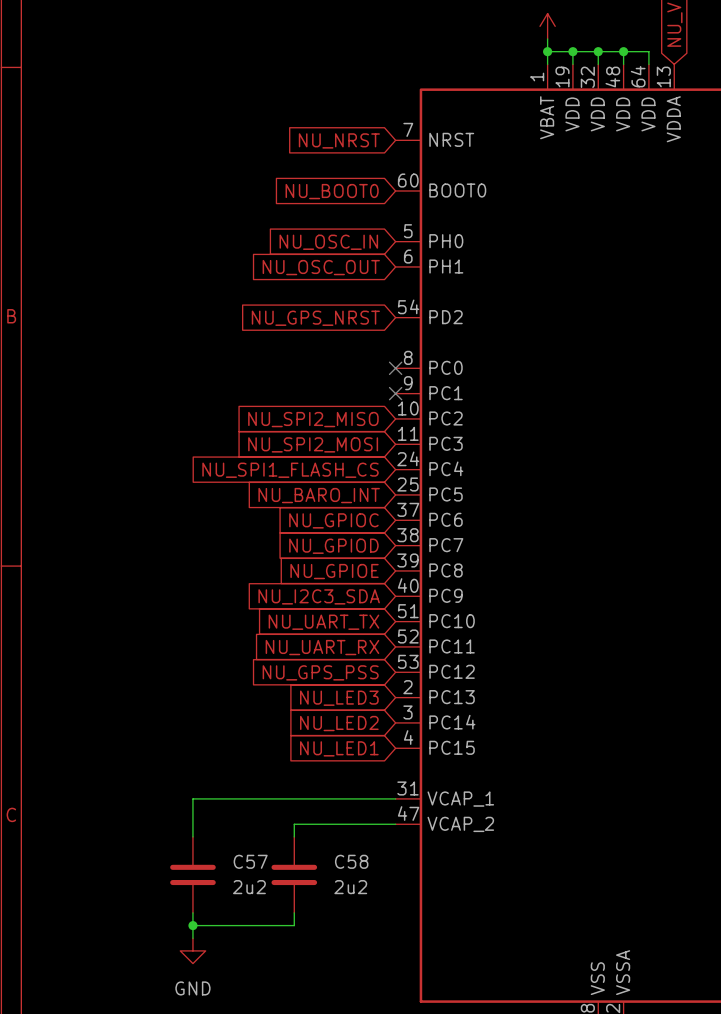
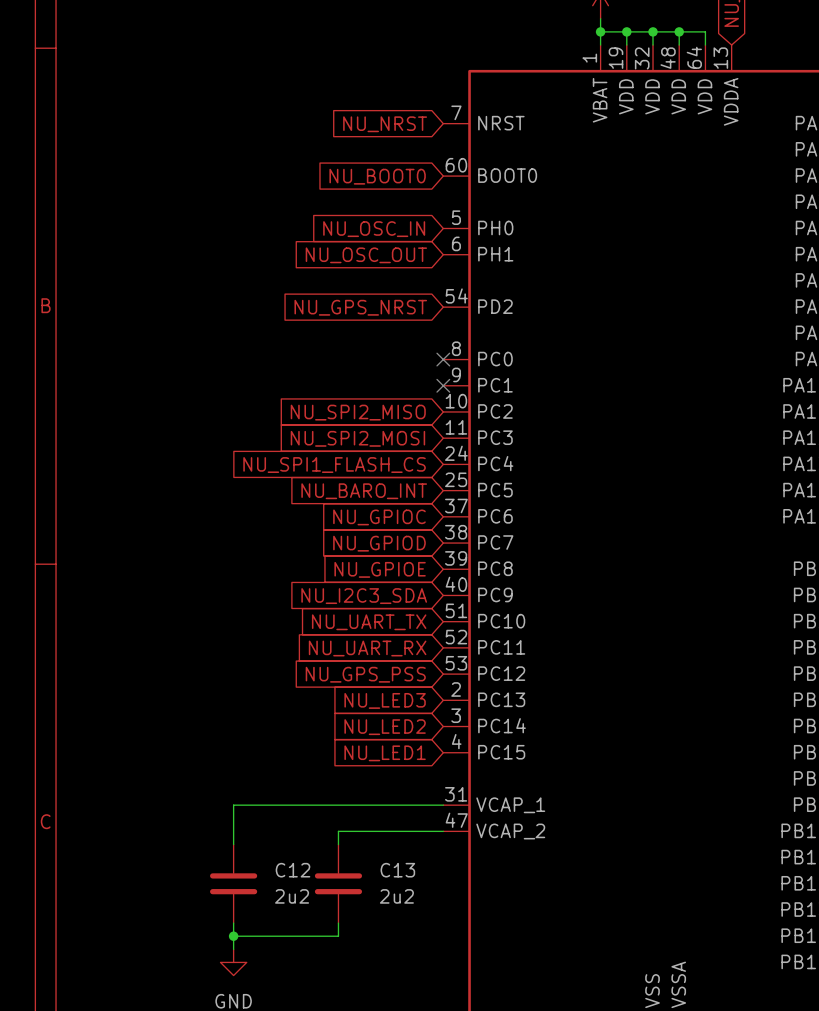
C57 name: C57 (250, 861) -> C12 (293, 870)
C58 name: C58 (351, 861) -> C13 (397, 870)

